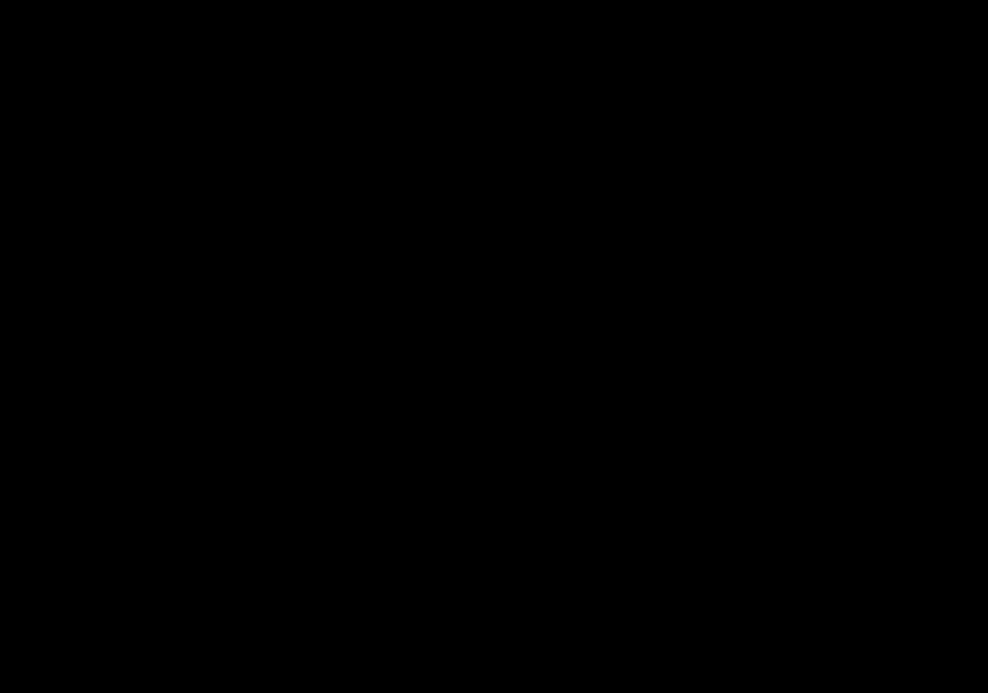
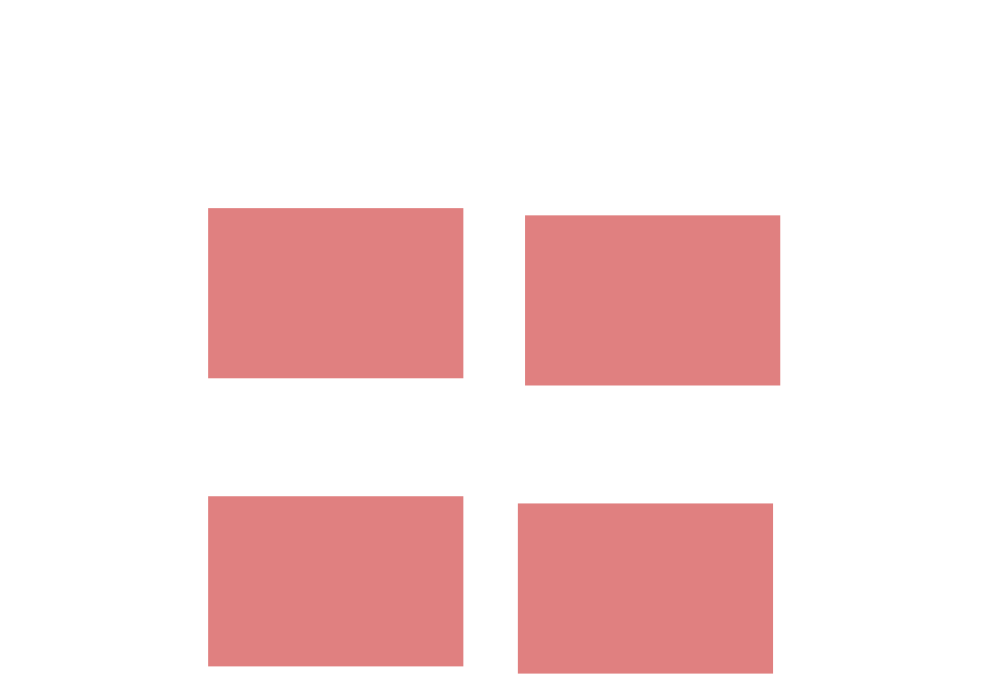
part: none -> (335, 293)
part: none -> (652, 300)
part: none -> (335, 581)
part: none -> (645, 588)

